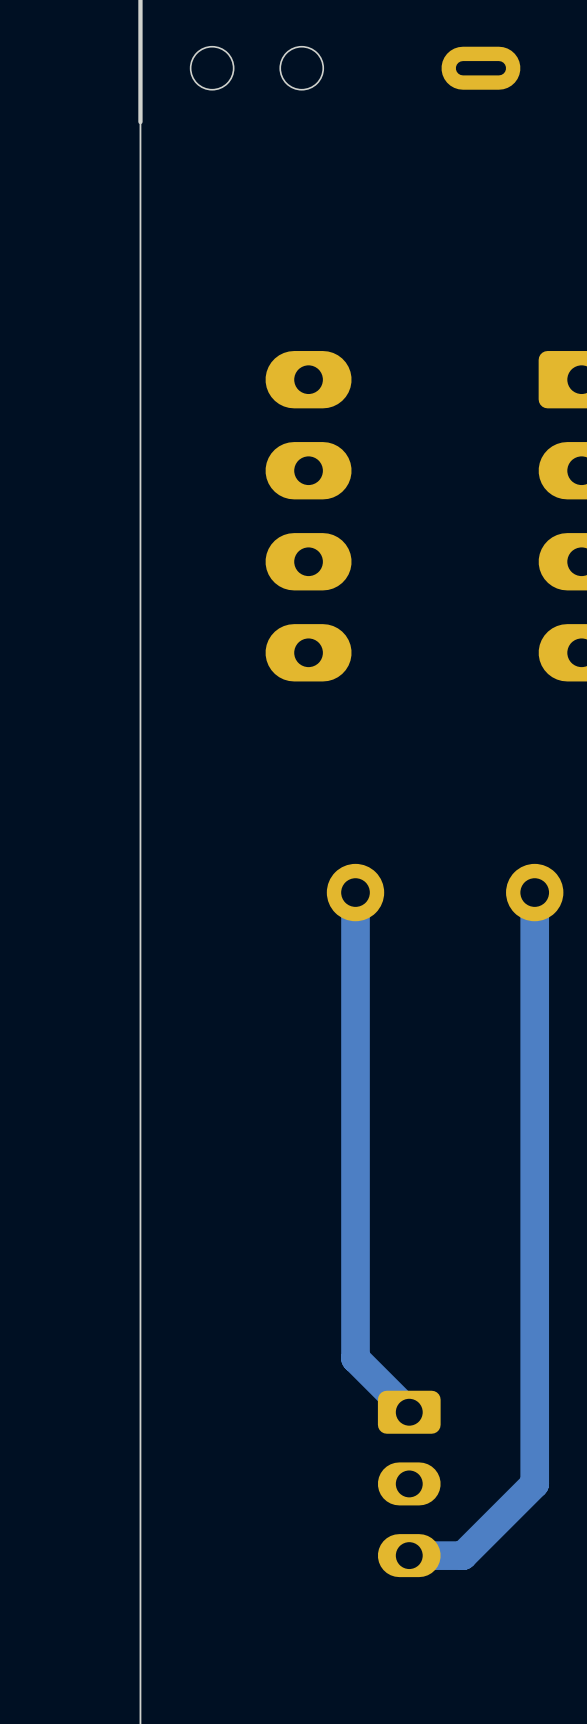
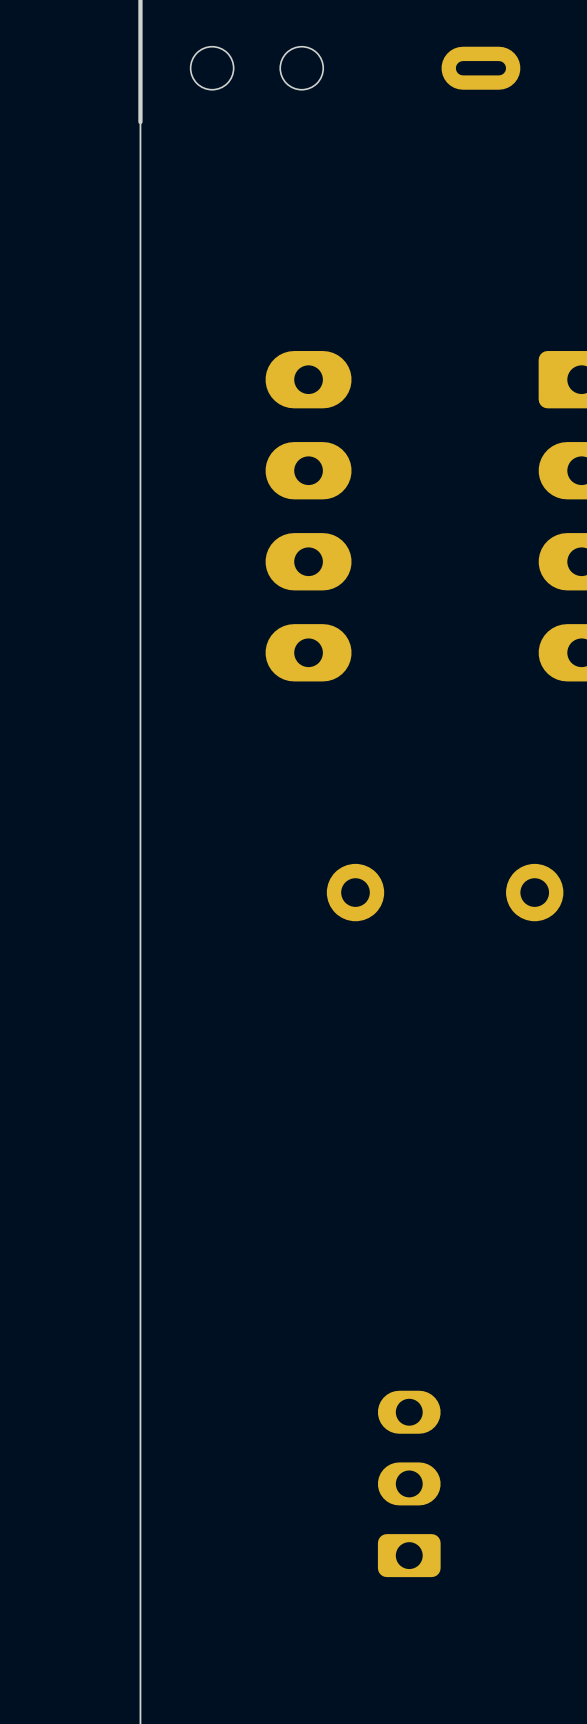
track: (355, 892) (355, 1358) (409, 1412) -> none
track: (534, 892) (534, 1483) (462, 1555) (409, 1555) -> none
part rotation: 0° (409, 1483) -> 180° (409, 1483)

